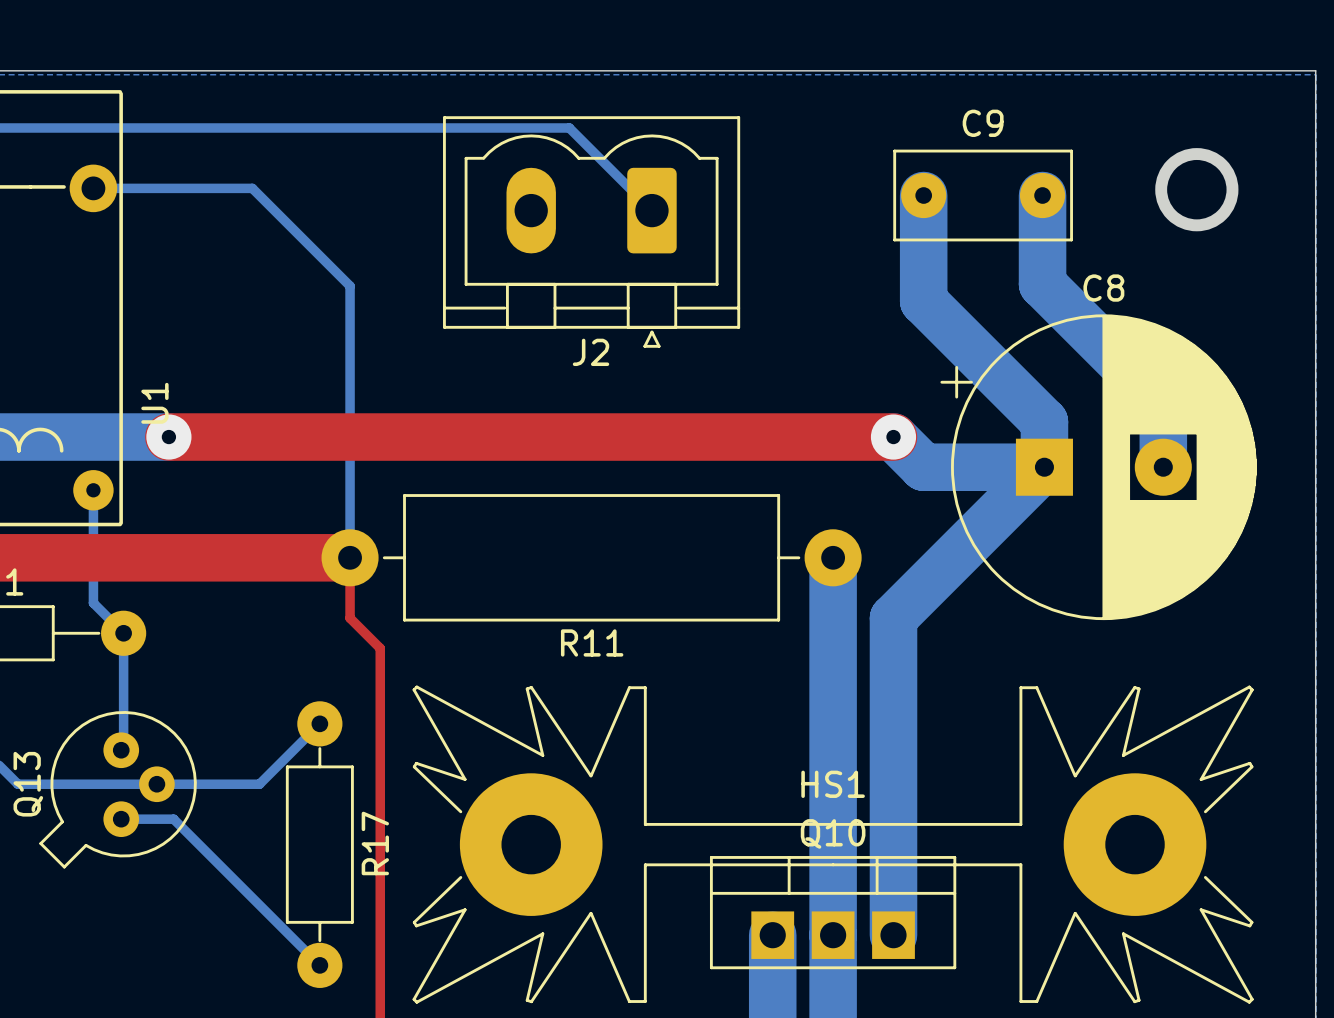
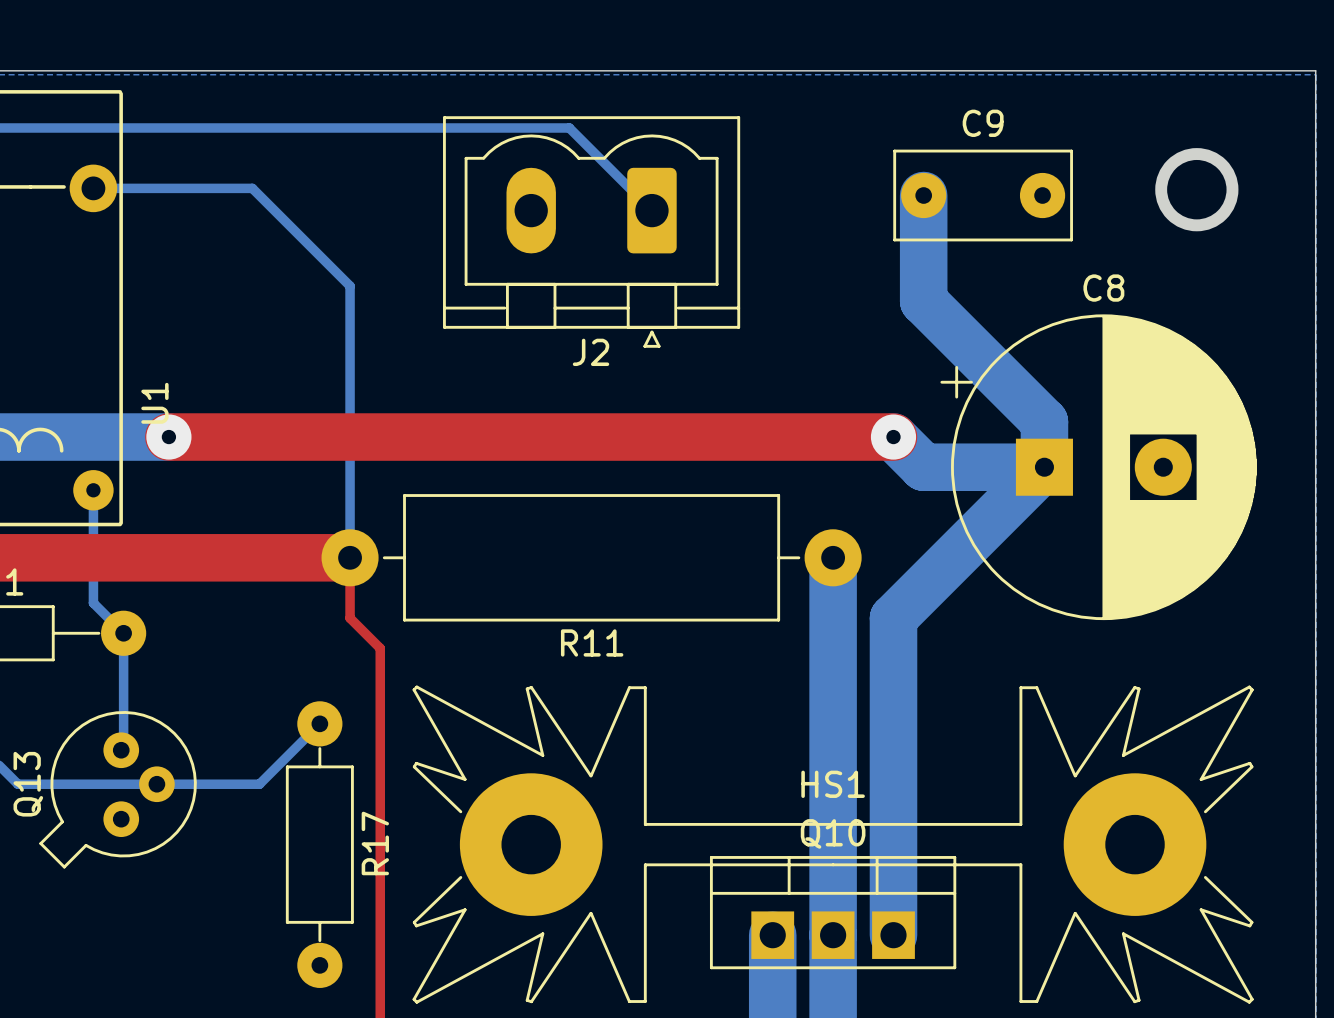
bottom track: (1042, 195) (1042, 284) (1163, 404) (1163, 467) -> none
bottom track: (121, 819) (173, 819) (319, 965) -> none

